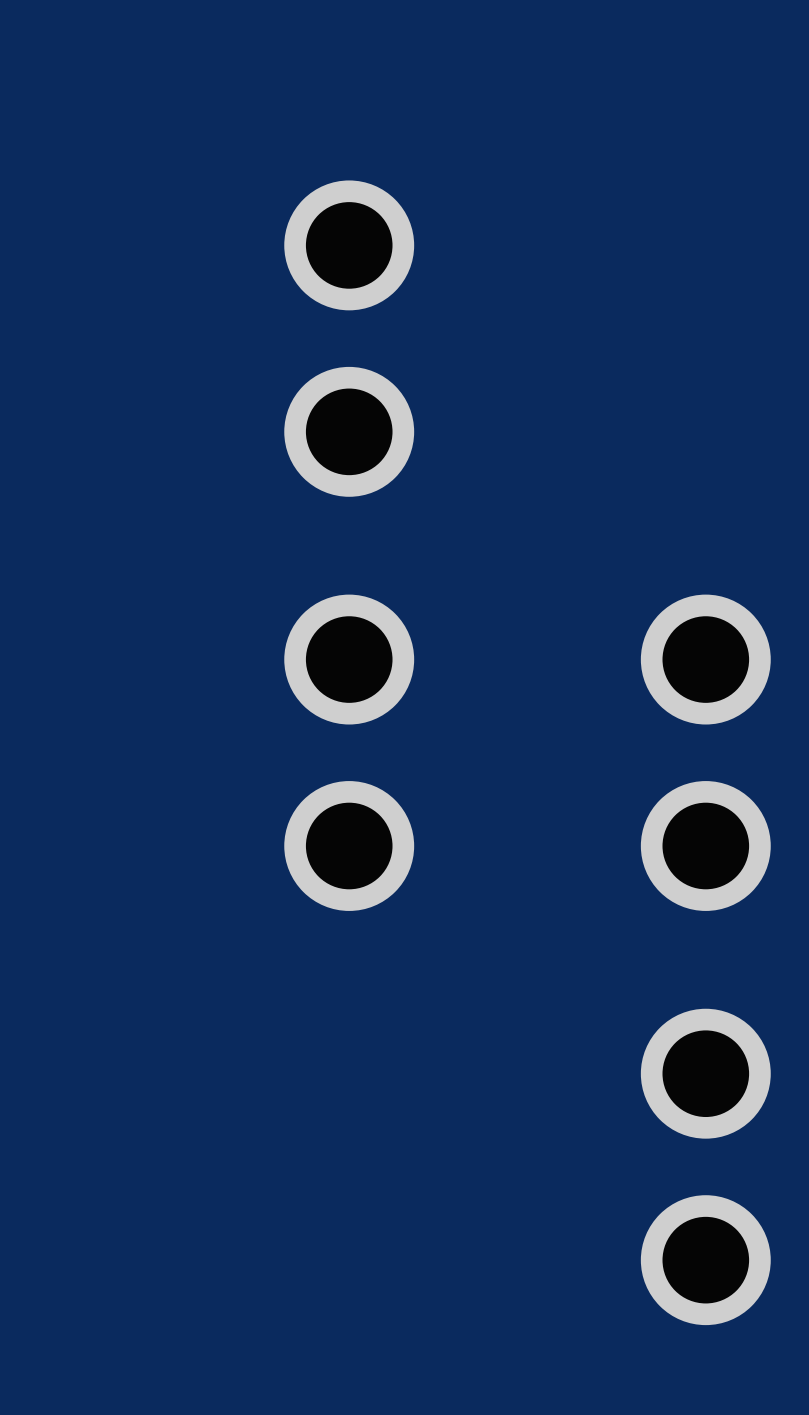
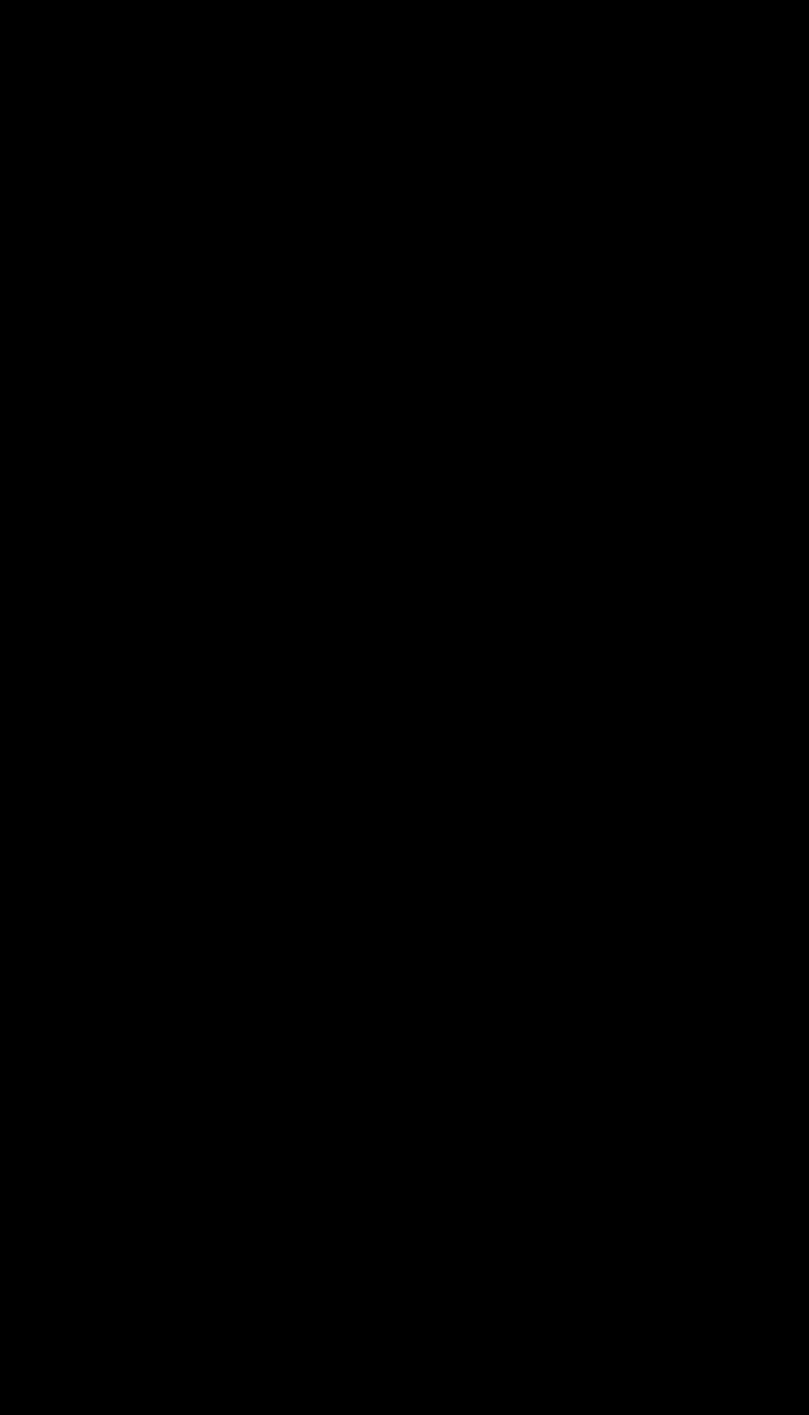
part: (349, 545) -> none
part: (705, 959) -> none

